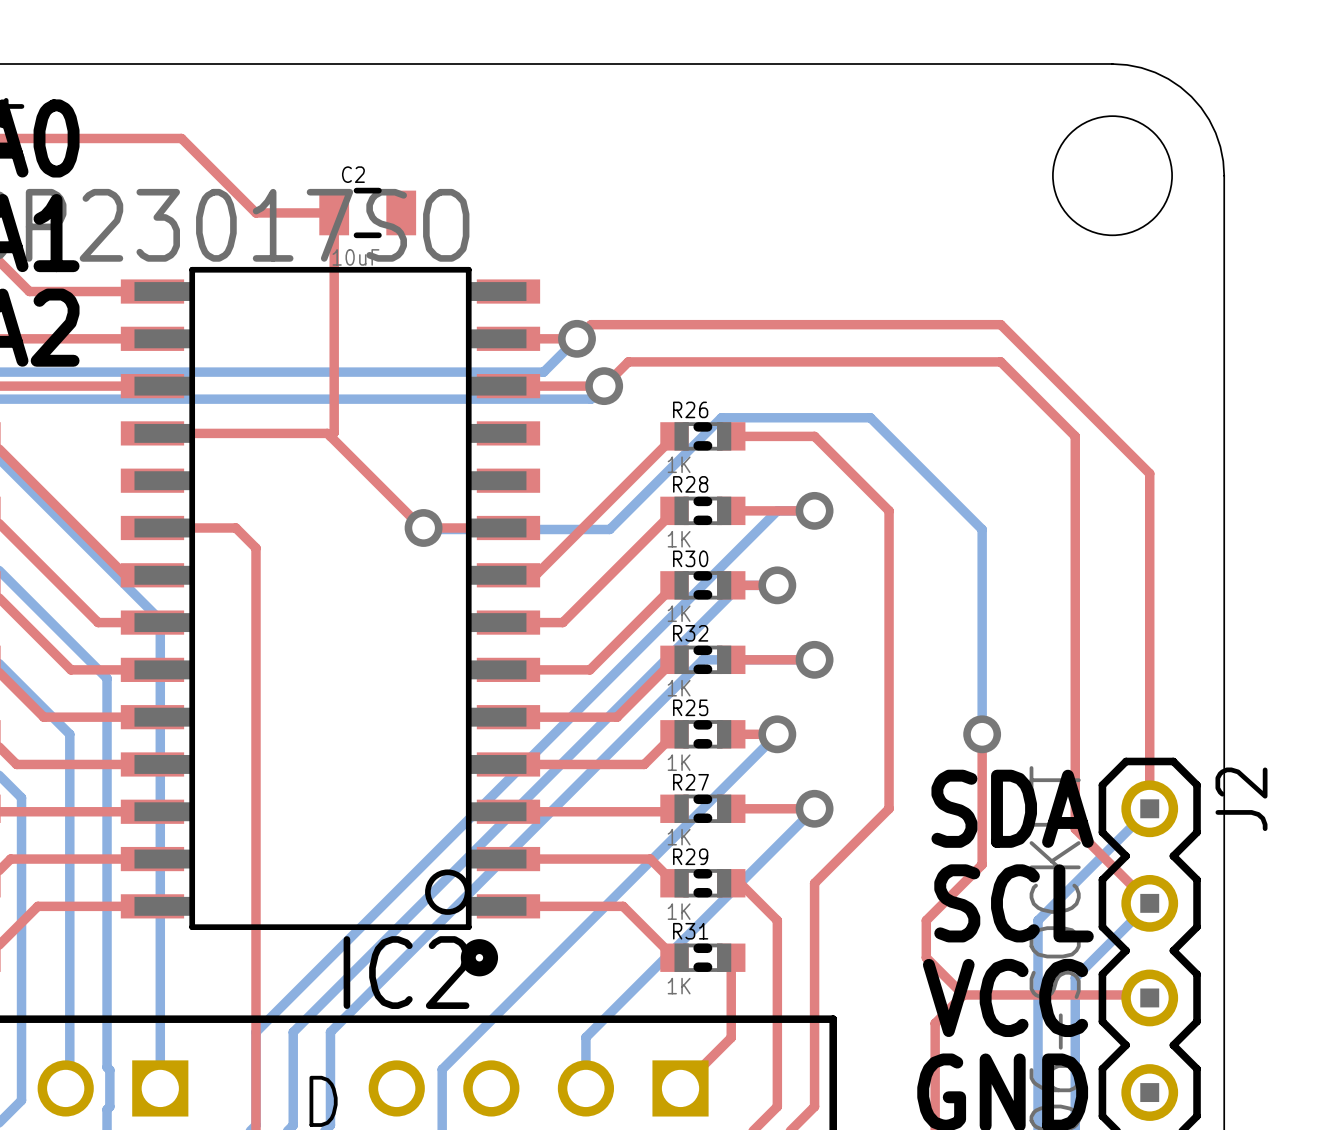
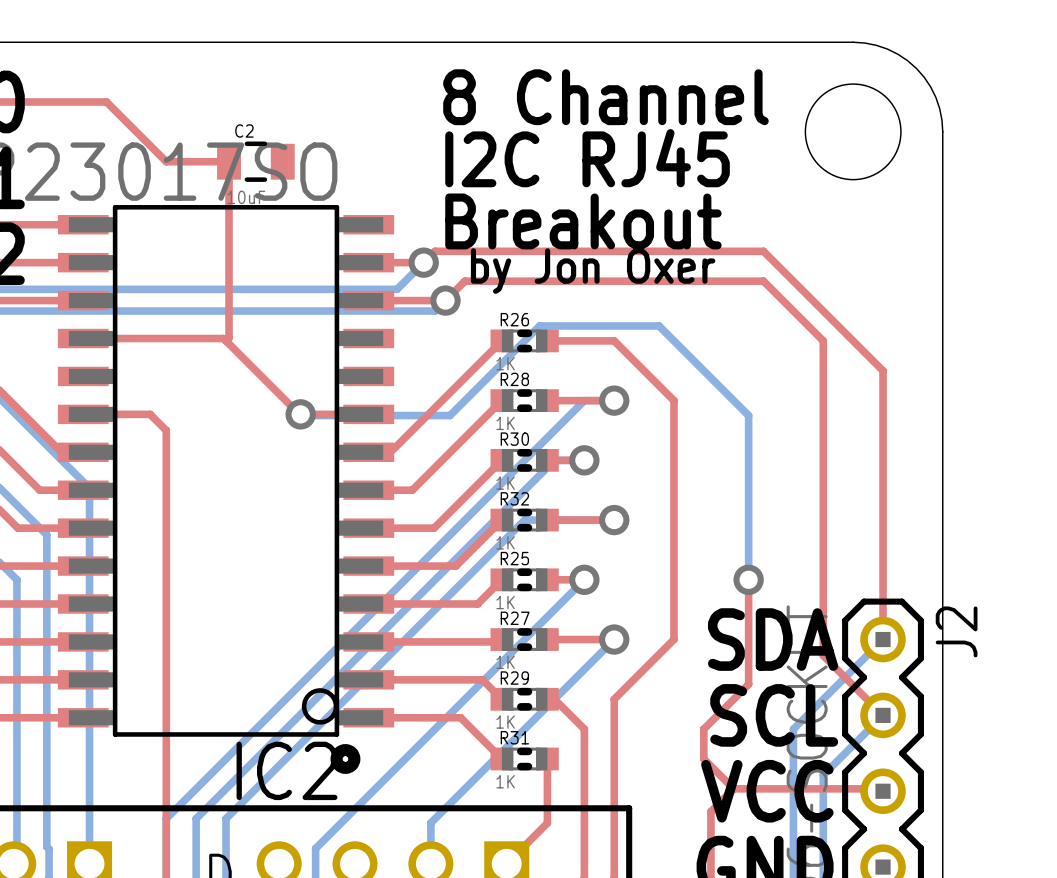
text: none -> 8 Channel (605, 97)
text: none -> I2C RJ45 (587, 158)
text: none -> Breakout (583, 221)
text: none -> by Jon Oxer (593, 271)

